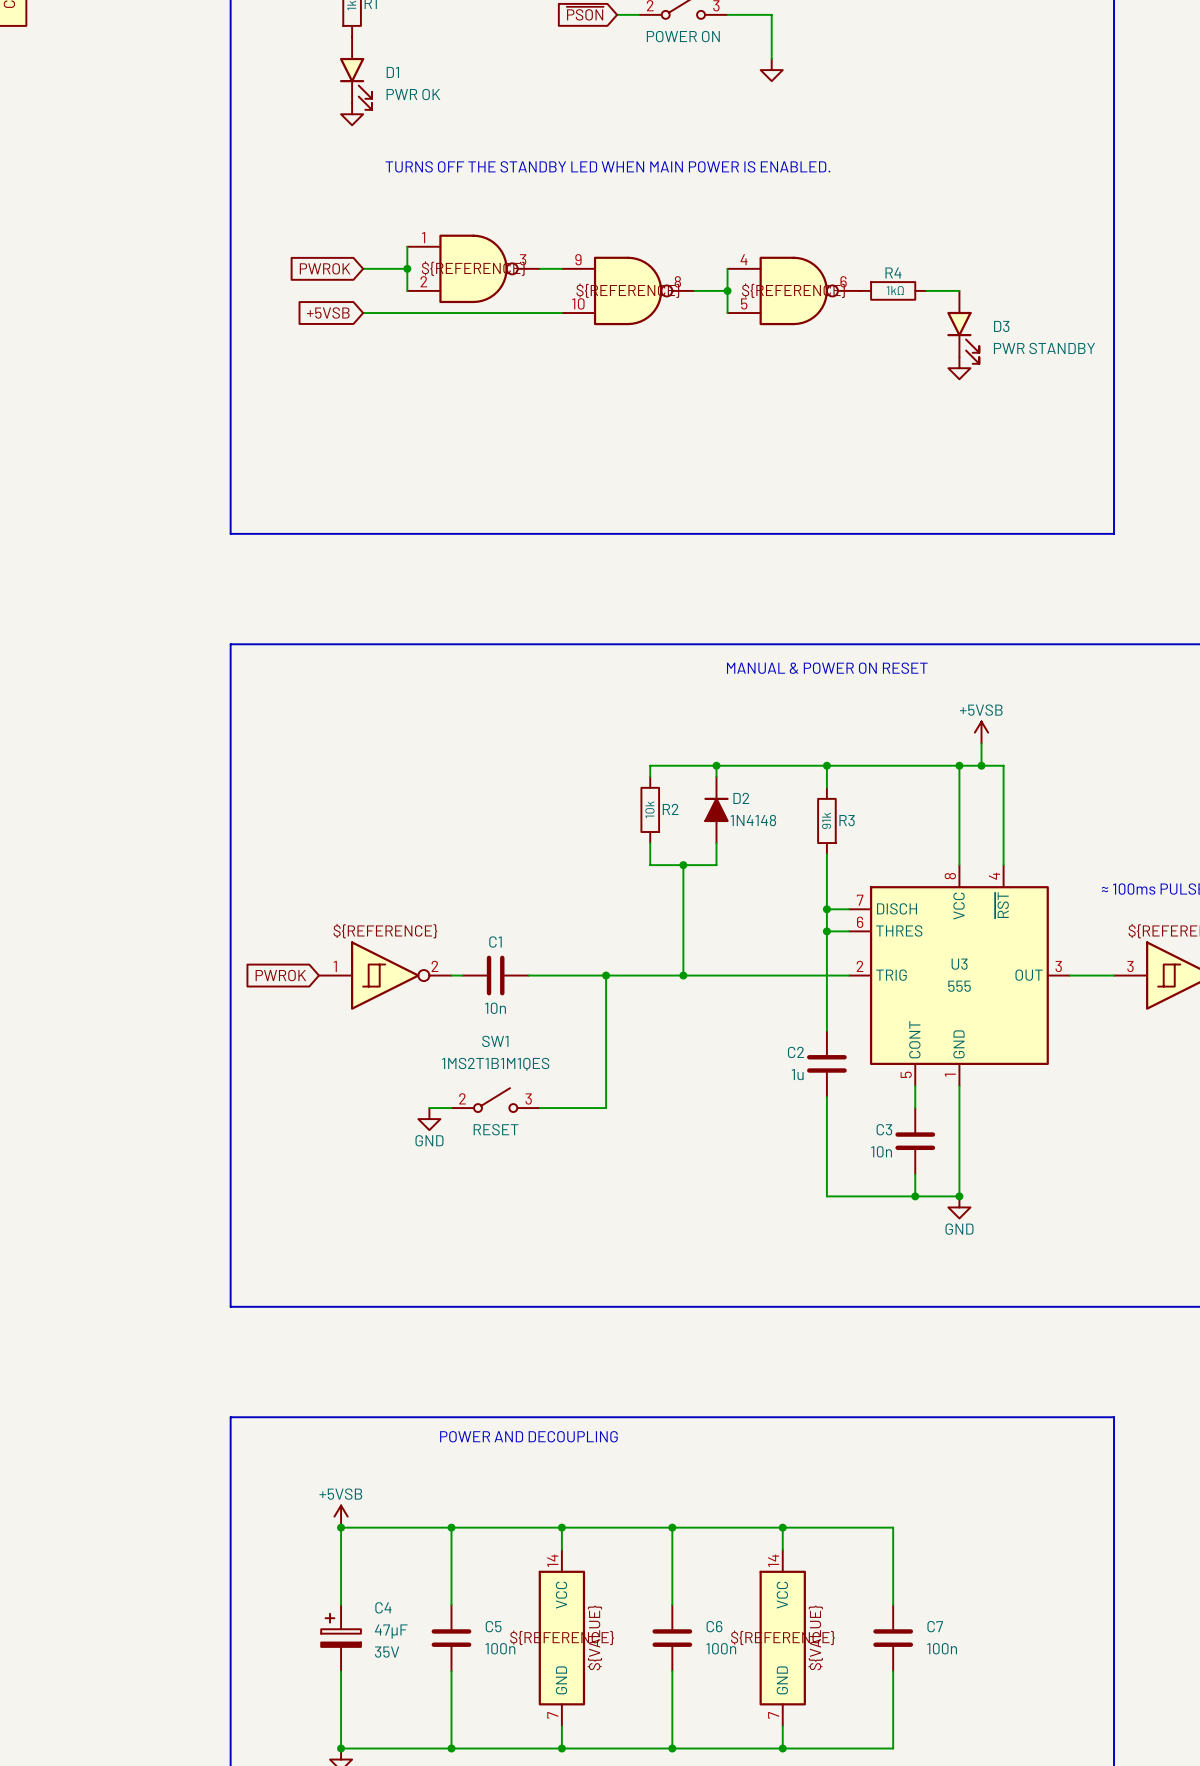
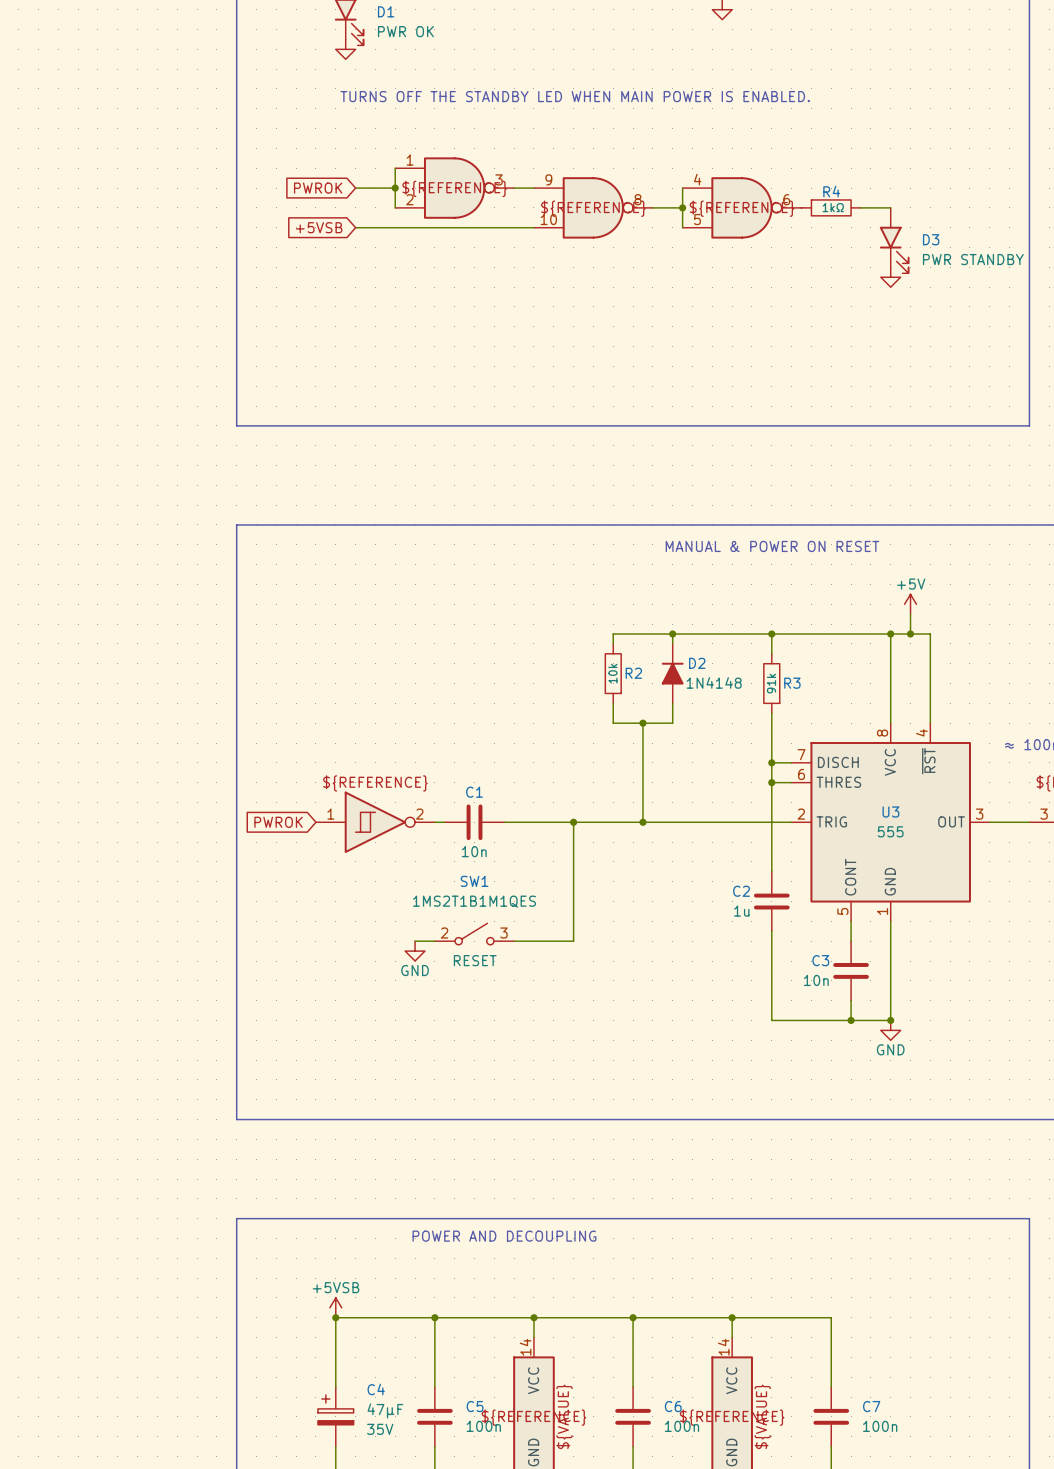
power symbol: +5VSB (981, 732) -> +5V (910, 604)

